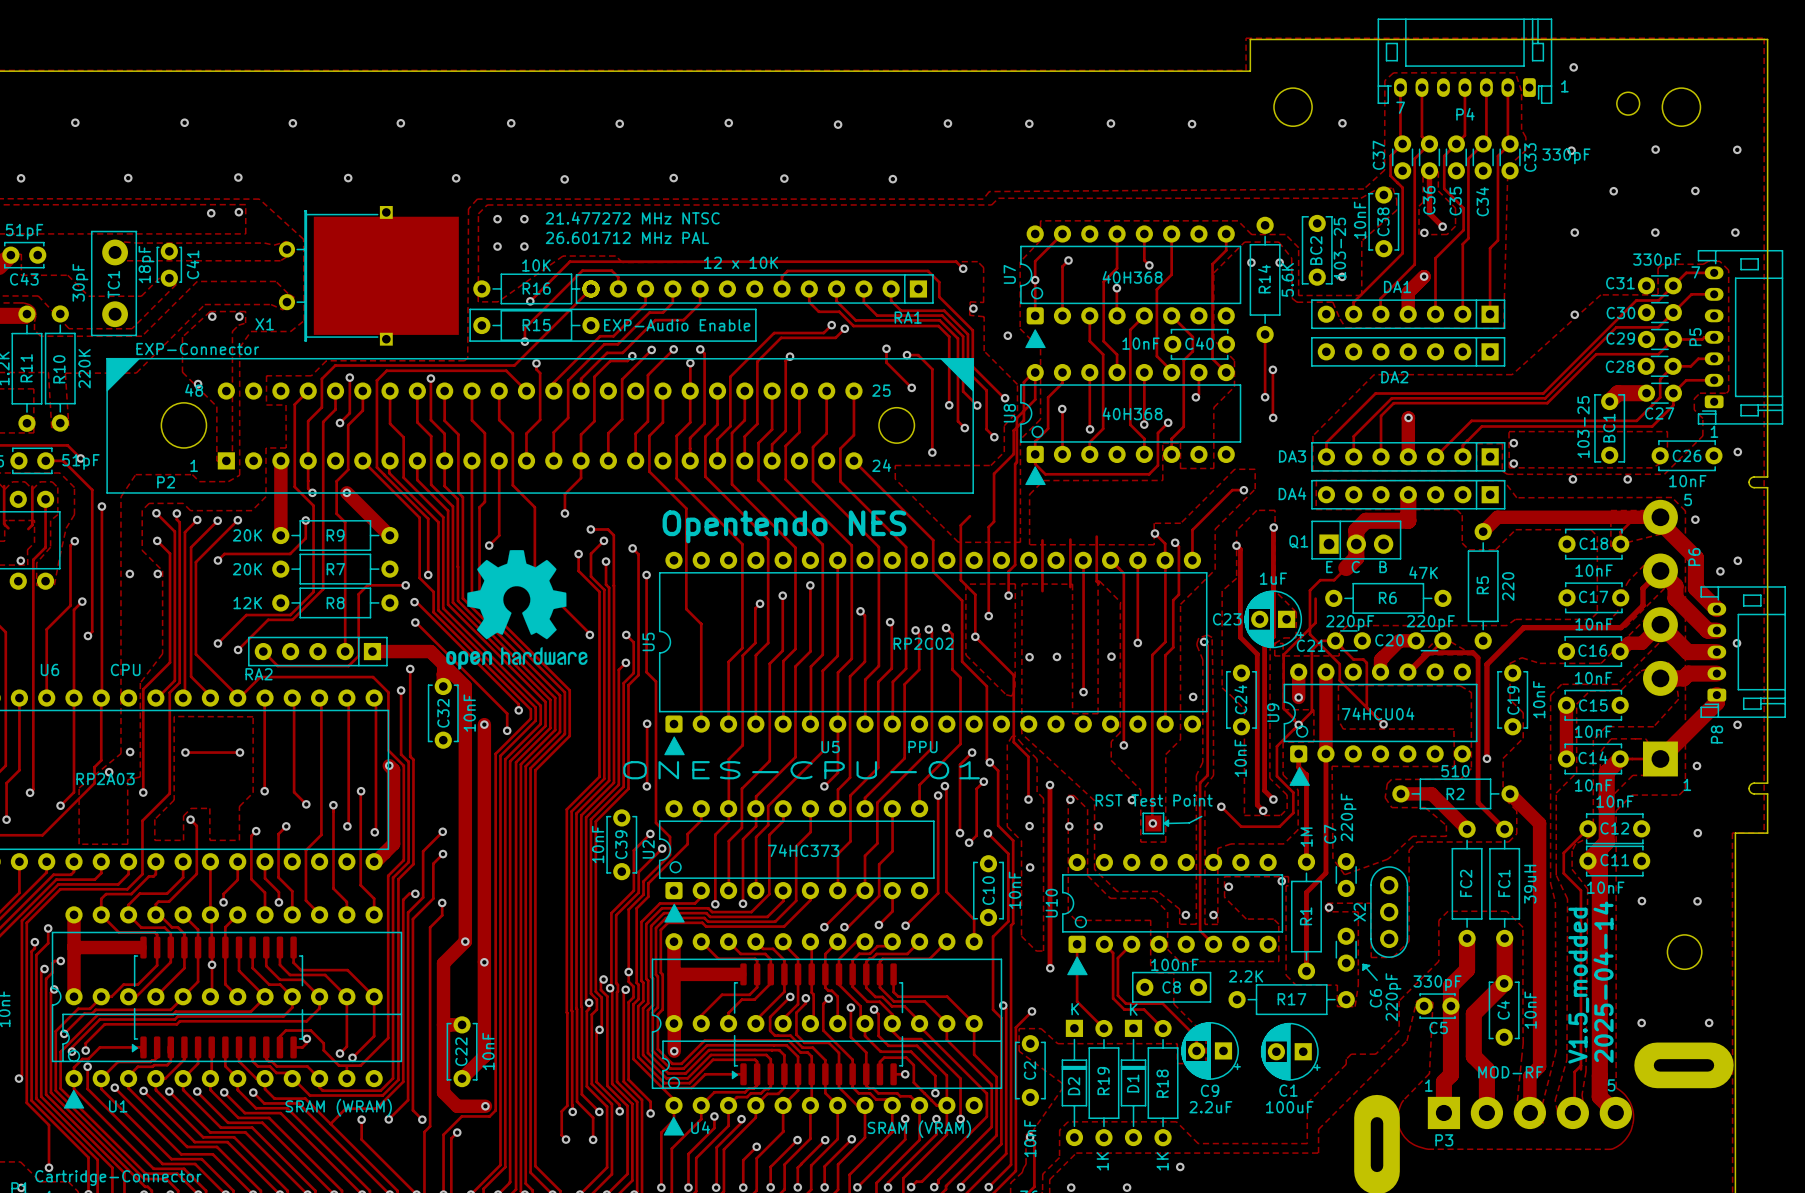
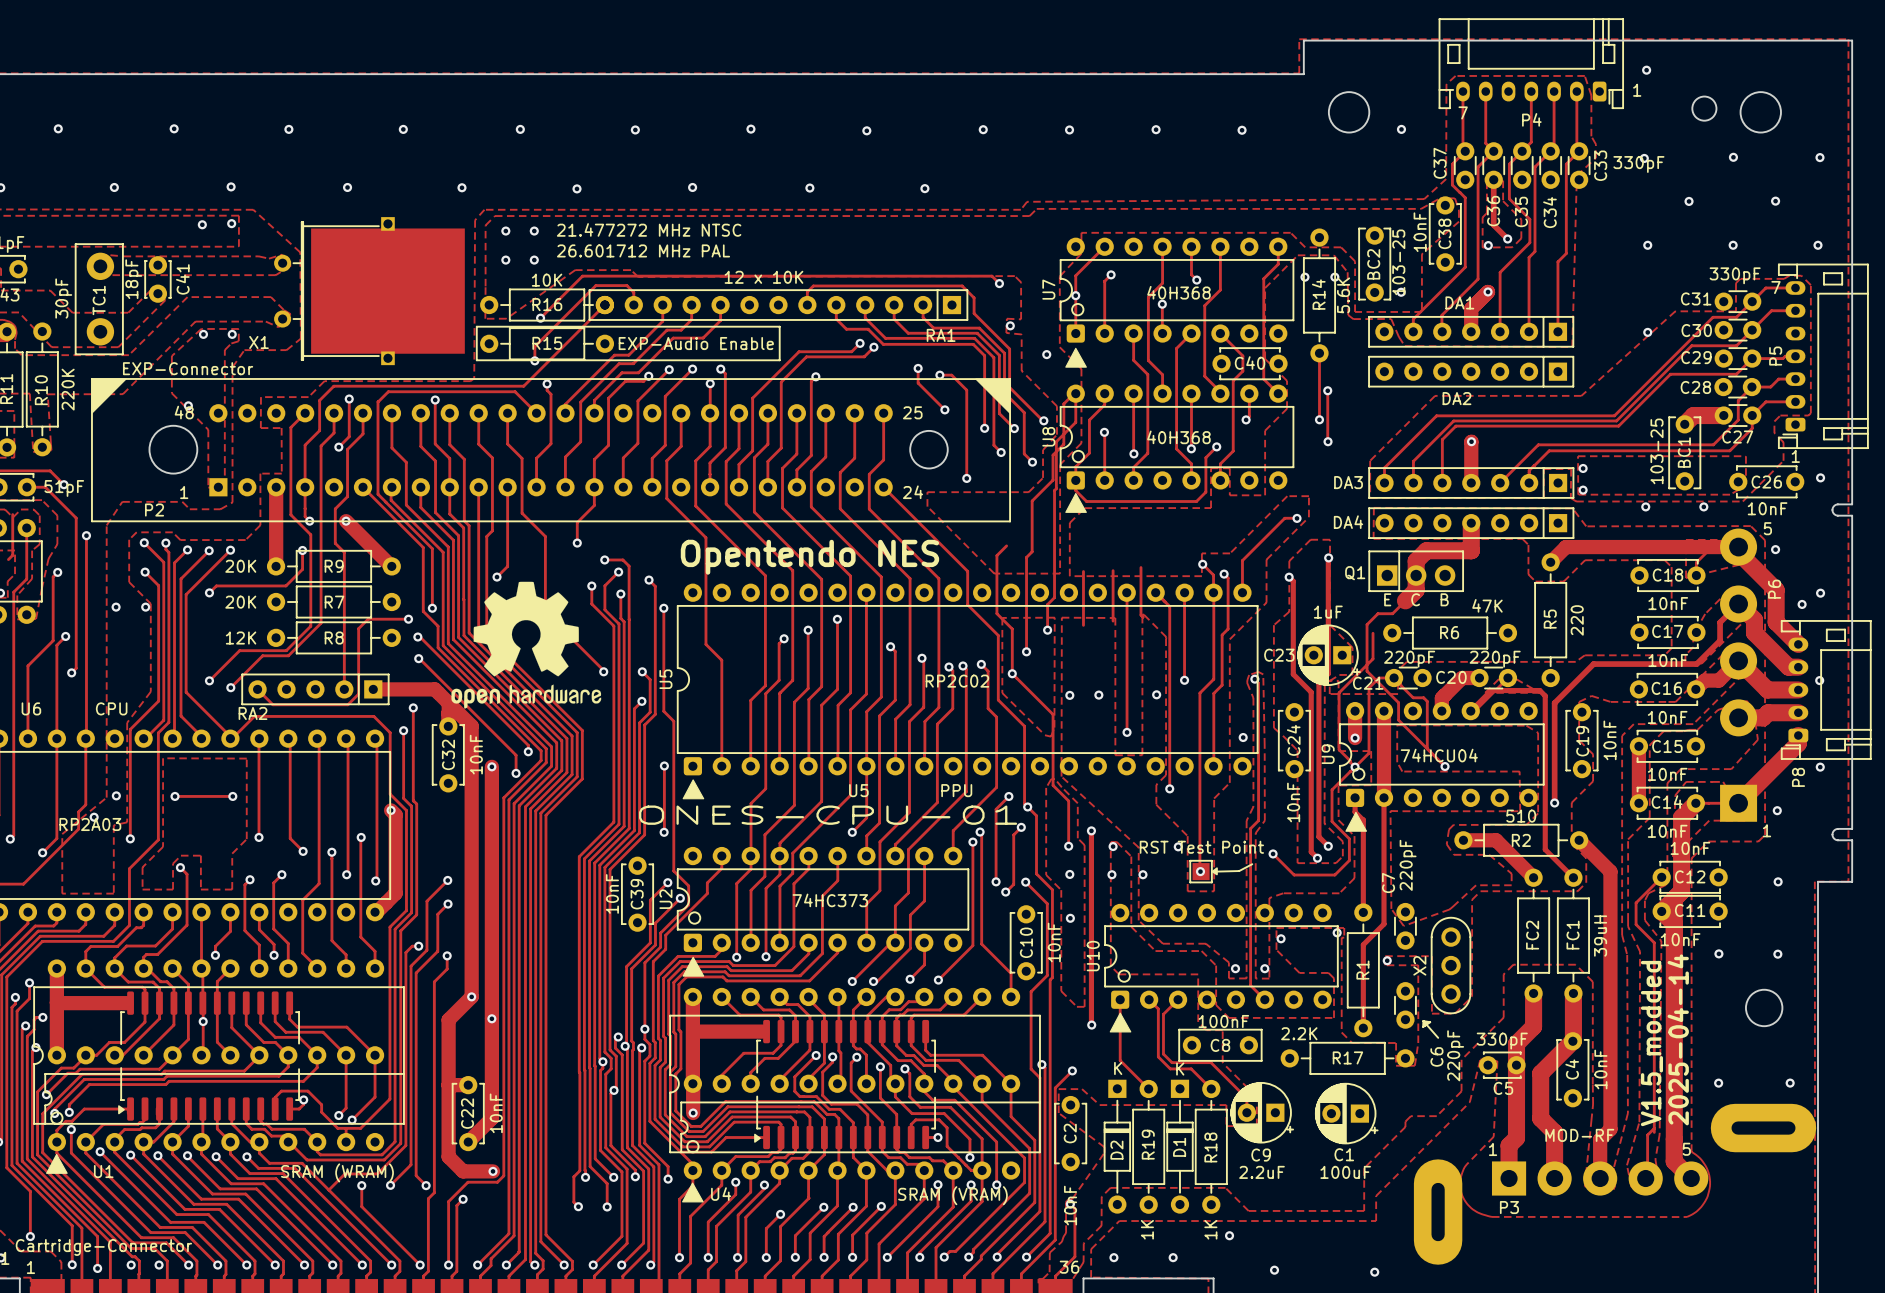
C40 value: 10nF (1141, 343) -> none
R1 value: 1M (1306, 837) -> none

